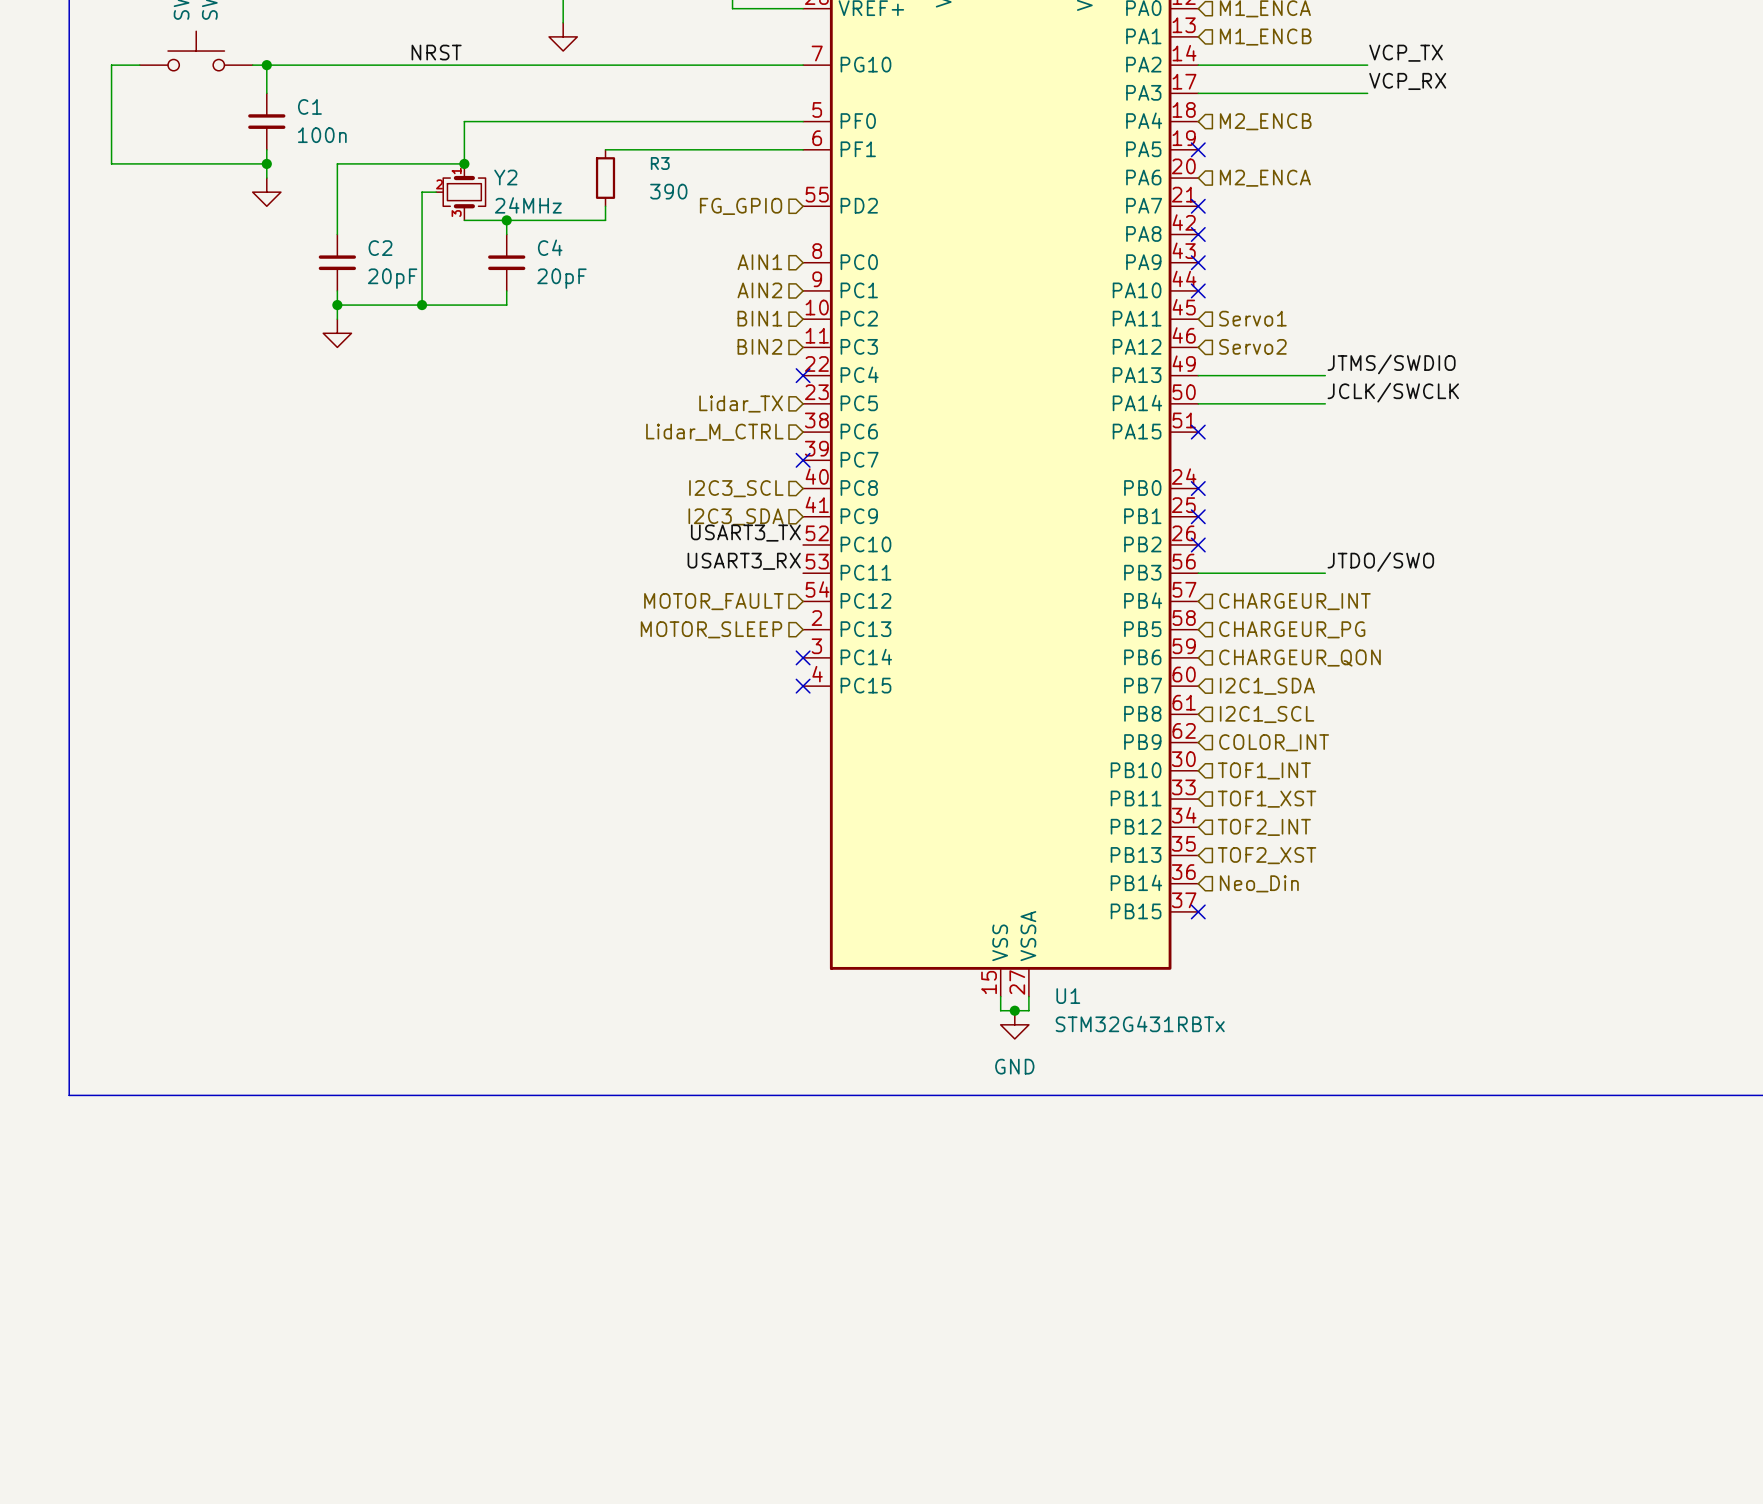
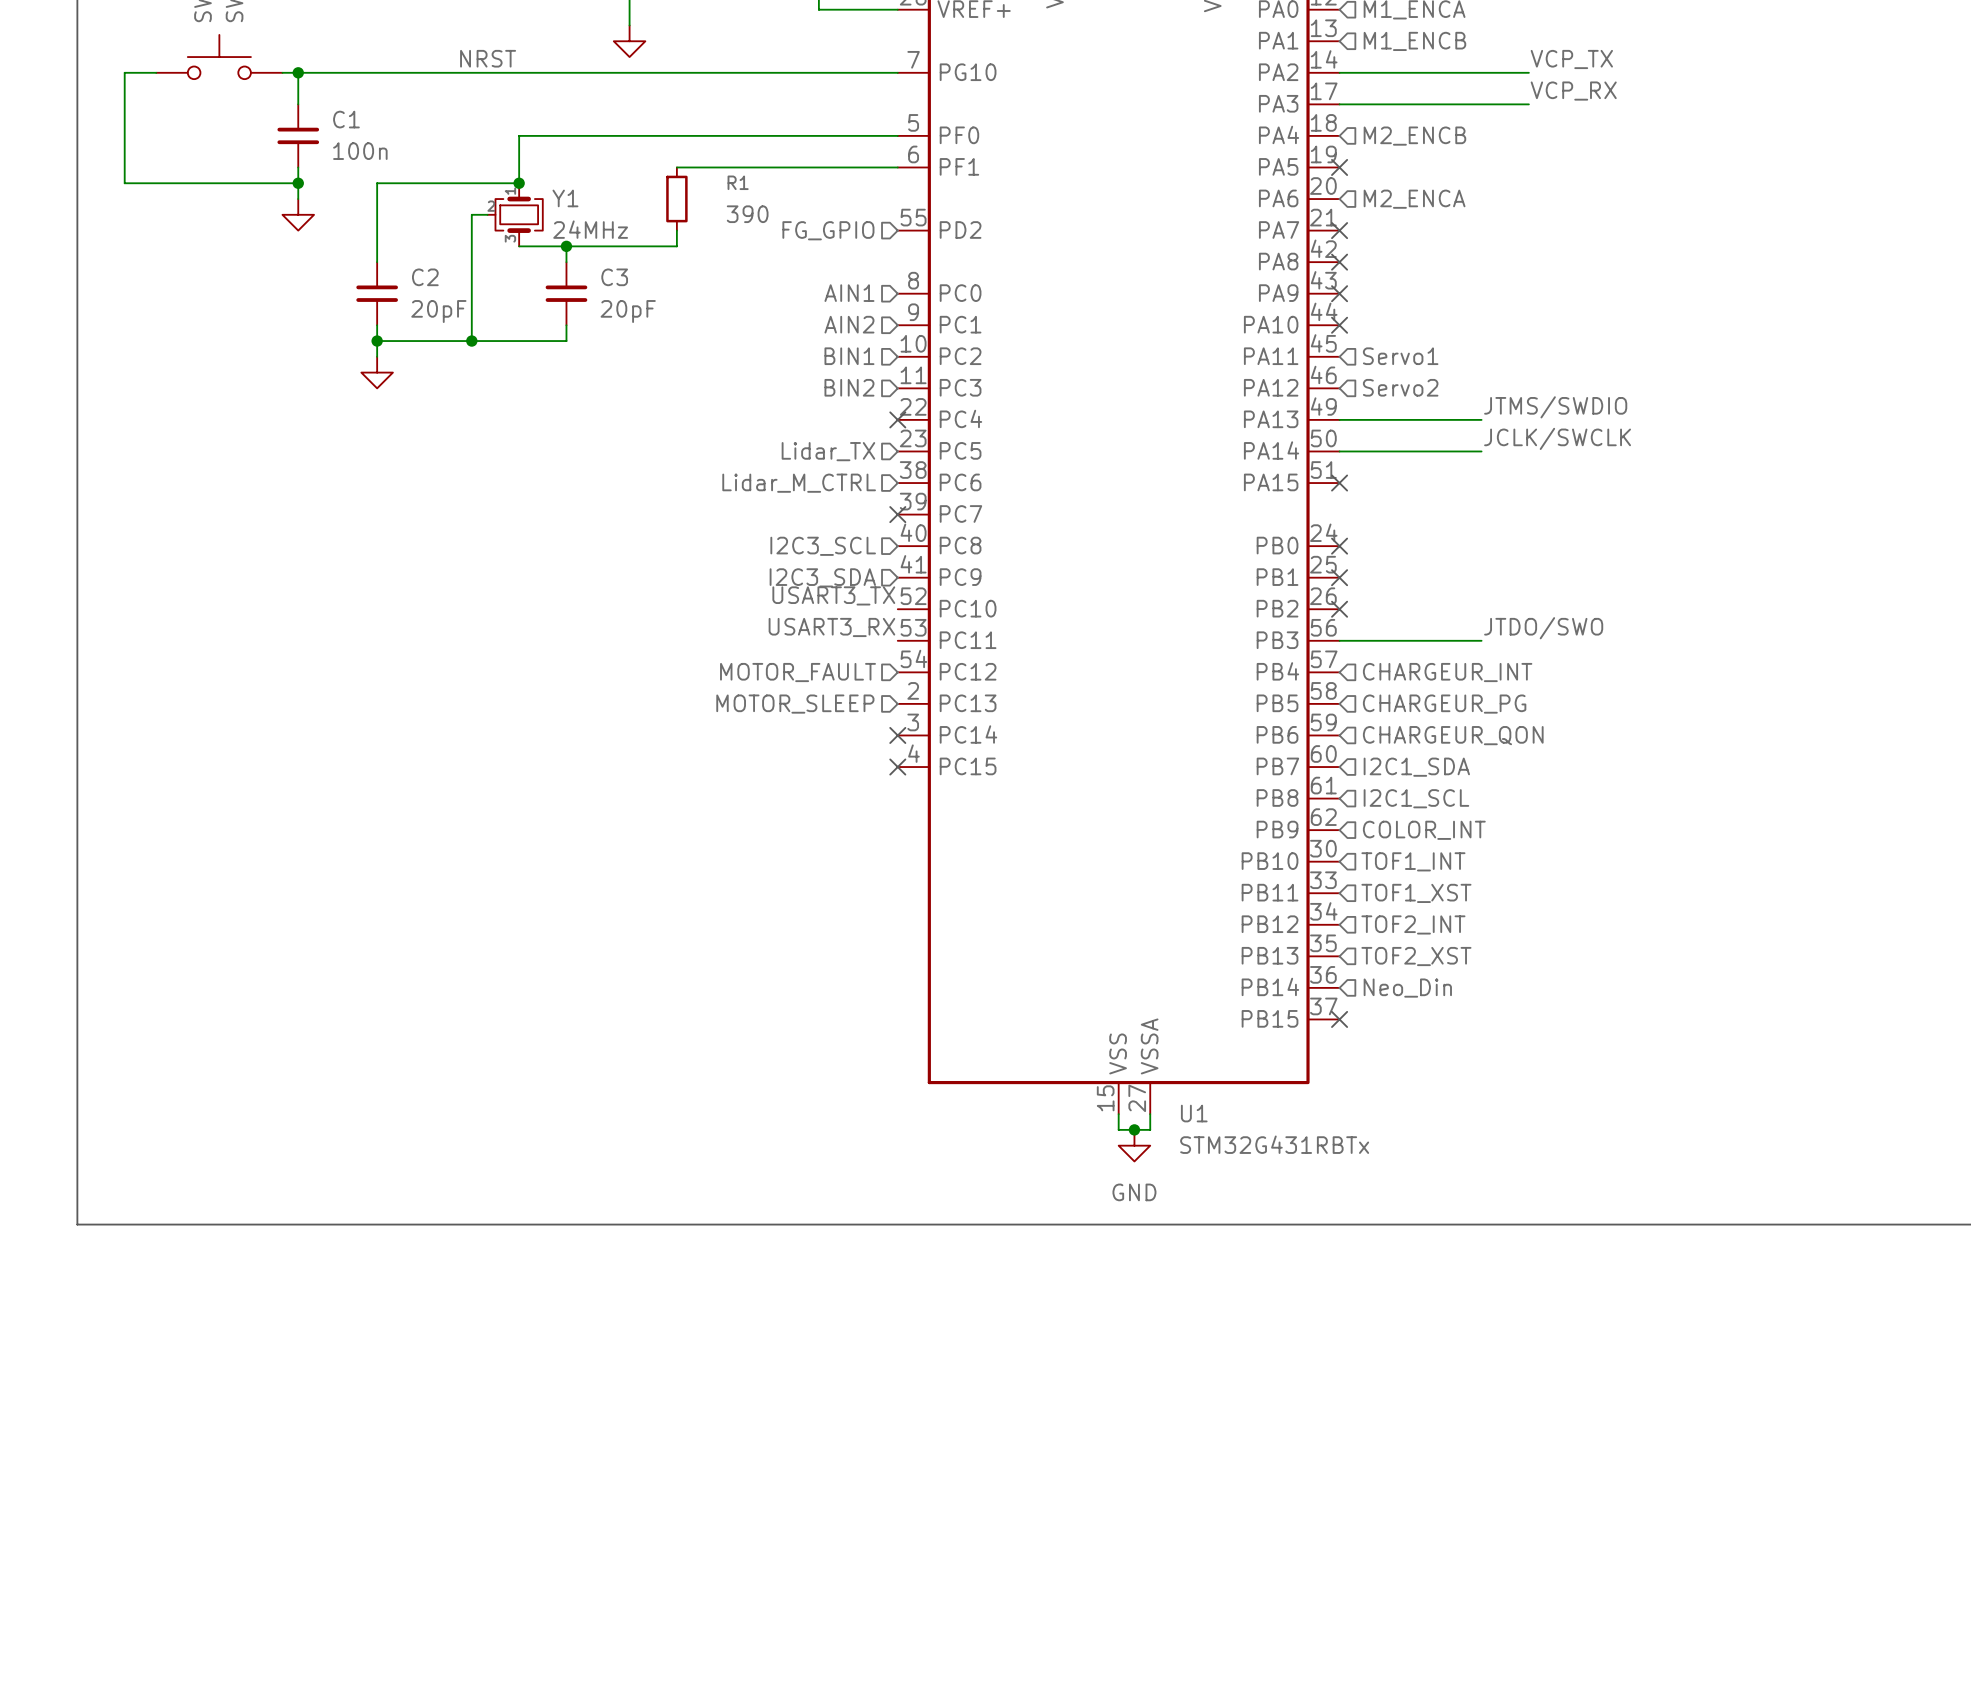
R3 name: R3 (660, 163) -> R1 (738, 182)
Y2 name: Y2 (505, 177) -> Y1 (565, 198)
C4 name: C4 (550, 247) -> C3 (614, 277)

